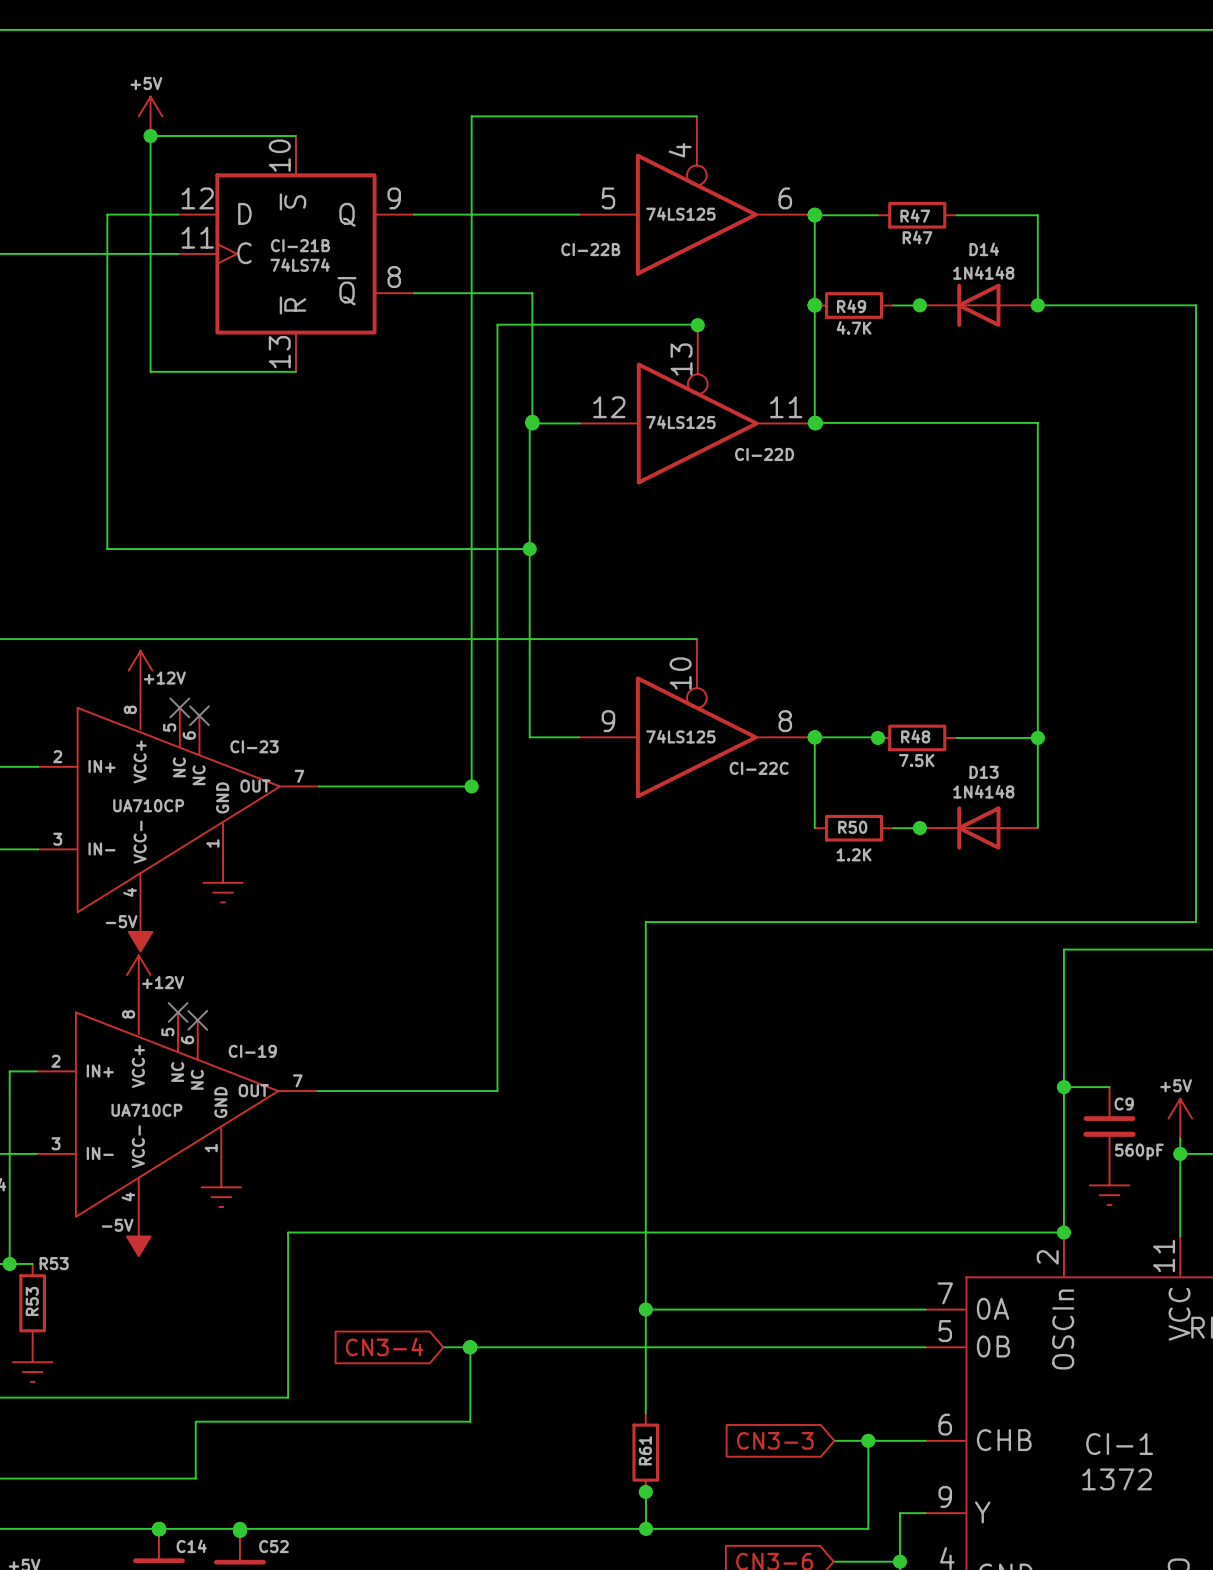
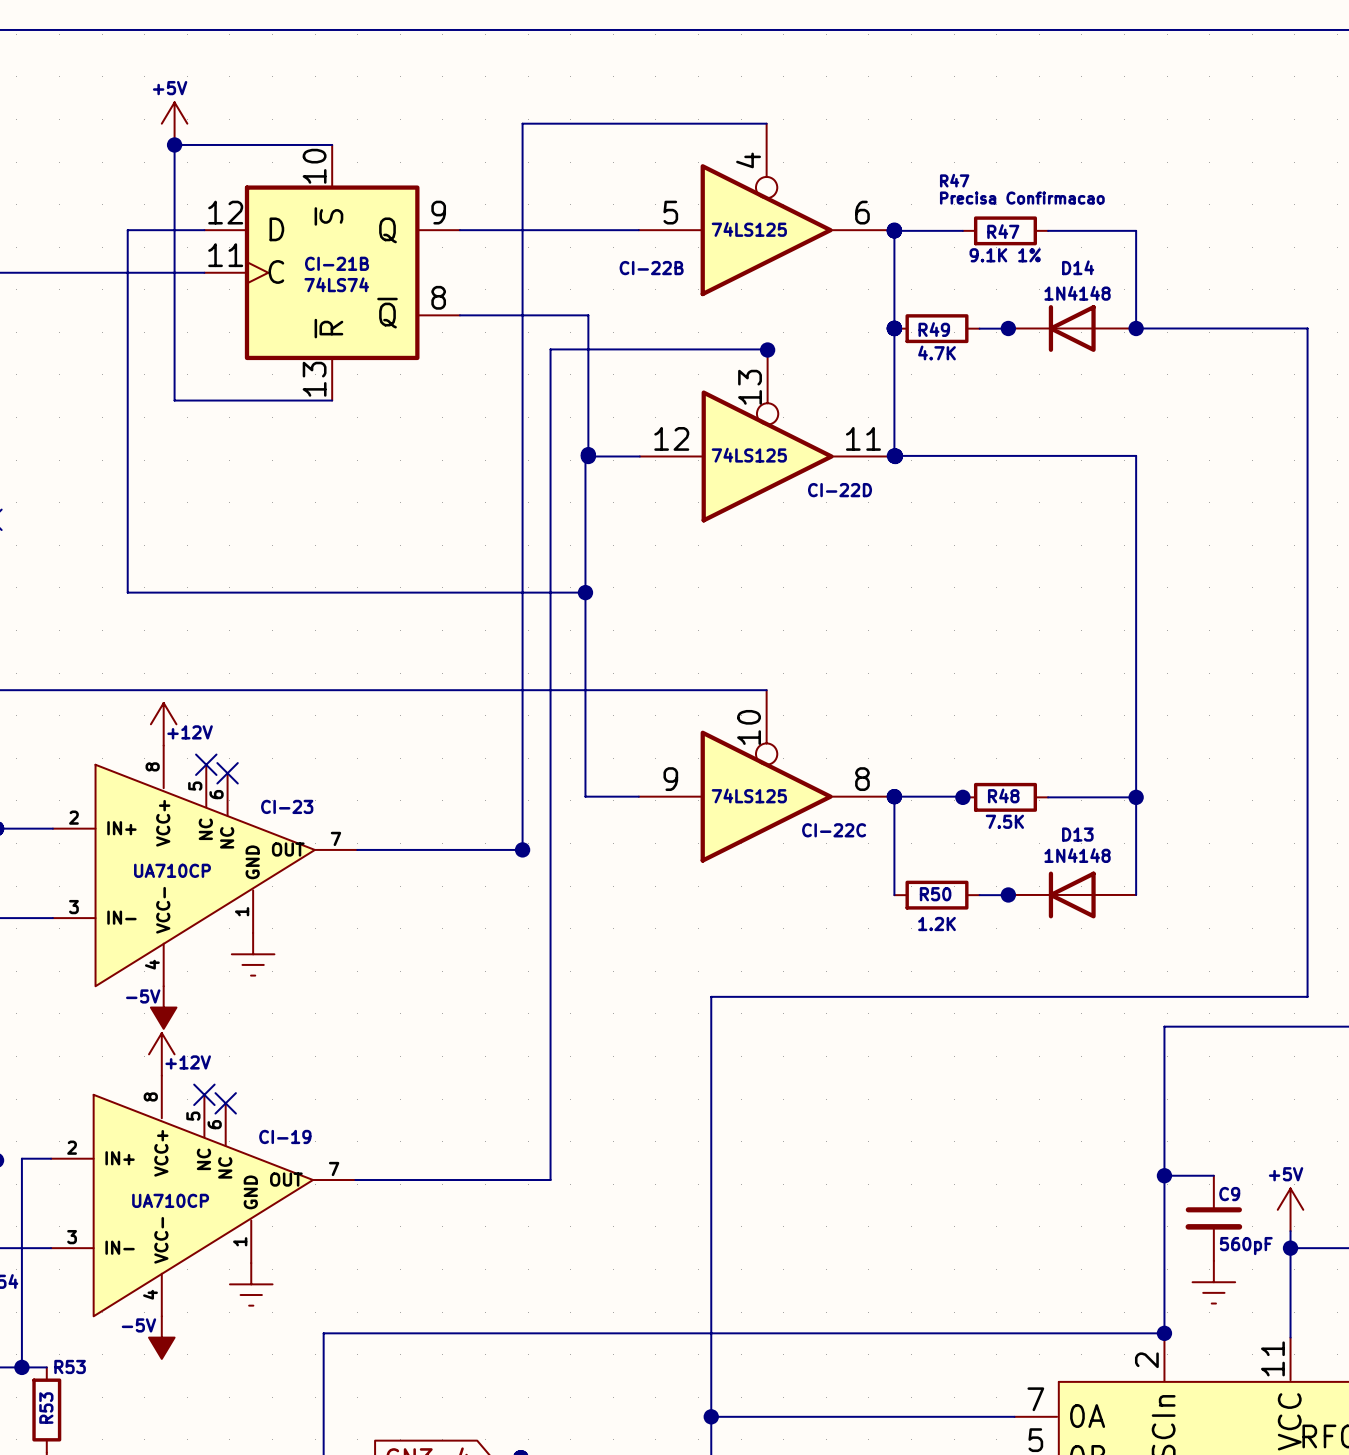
text: none -> R47 (954, 180)
text: none -> Precisa Confirmacao (1022, 198)
R47 value: R47 (917, 237) -> 9.1K 1% (1005, 255)

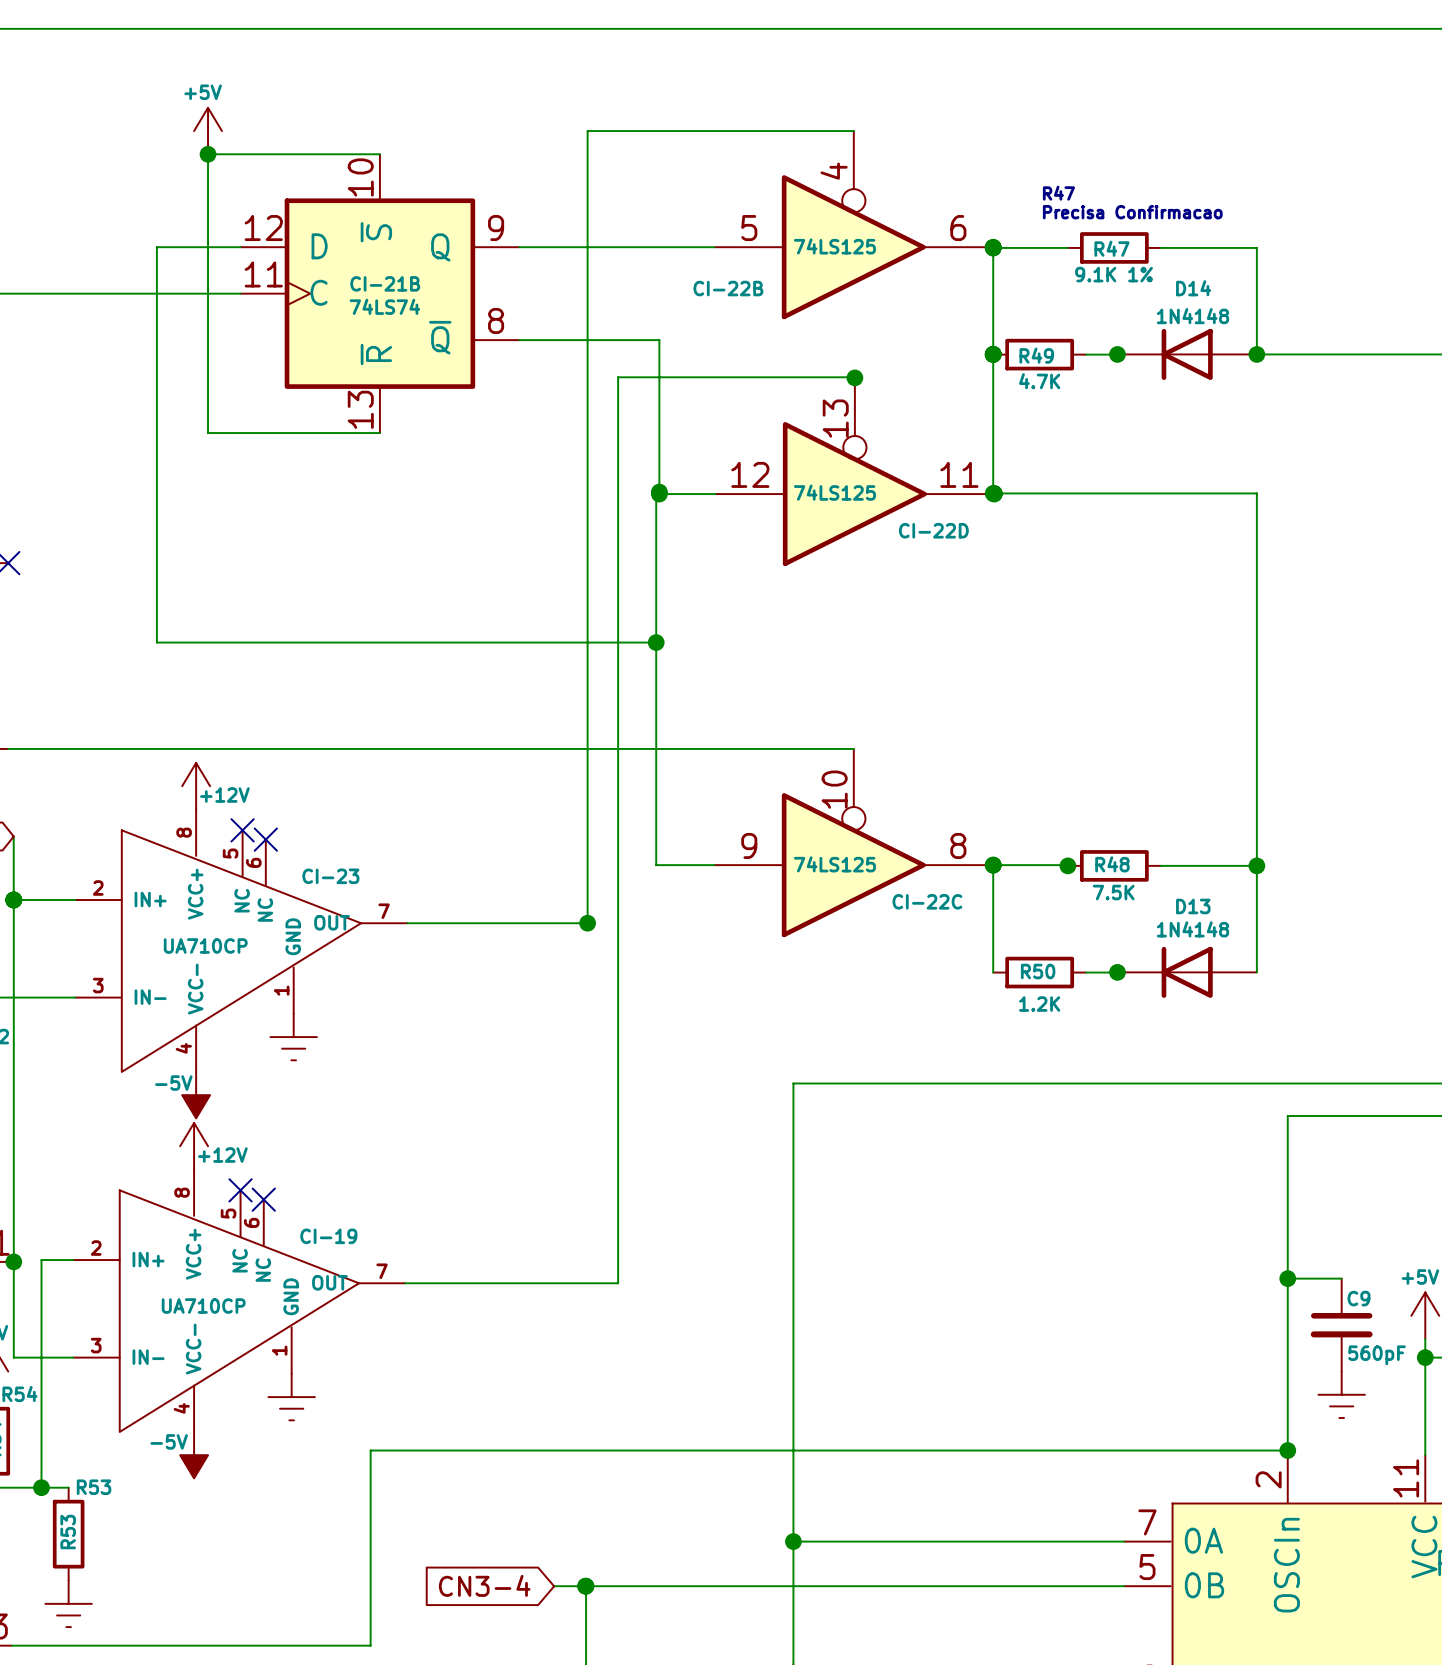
CI-23 symbol: [52, 745, 358, 987] -> [75, 809, 408, 1072]
CI-19 symbol: [51, 1075, 356, 1317] -> [73, 1169, 406, 1432]

